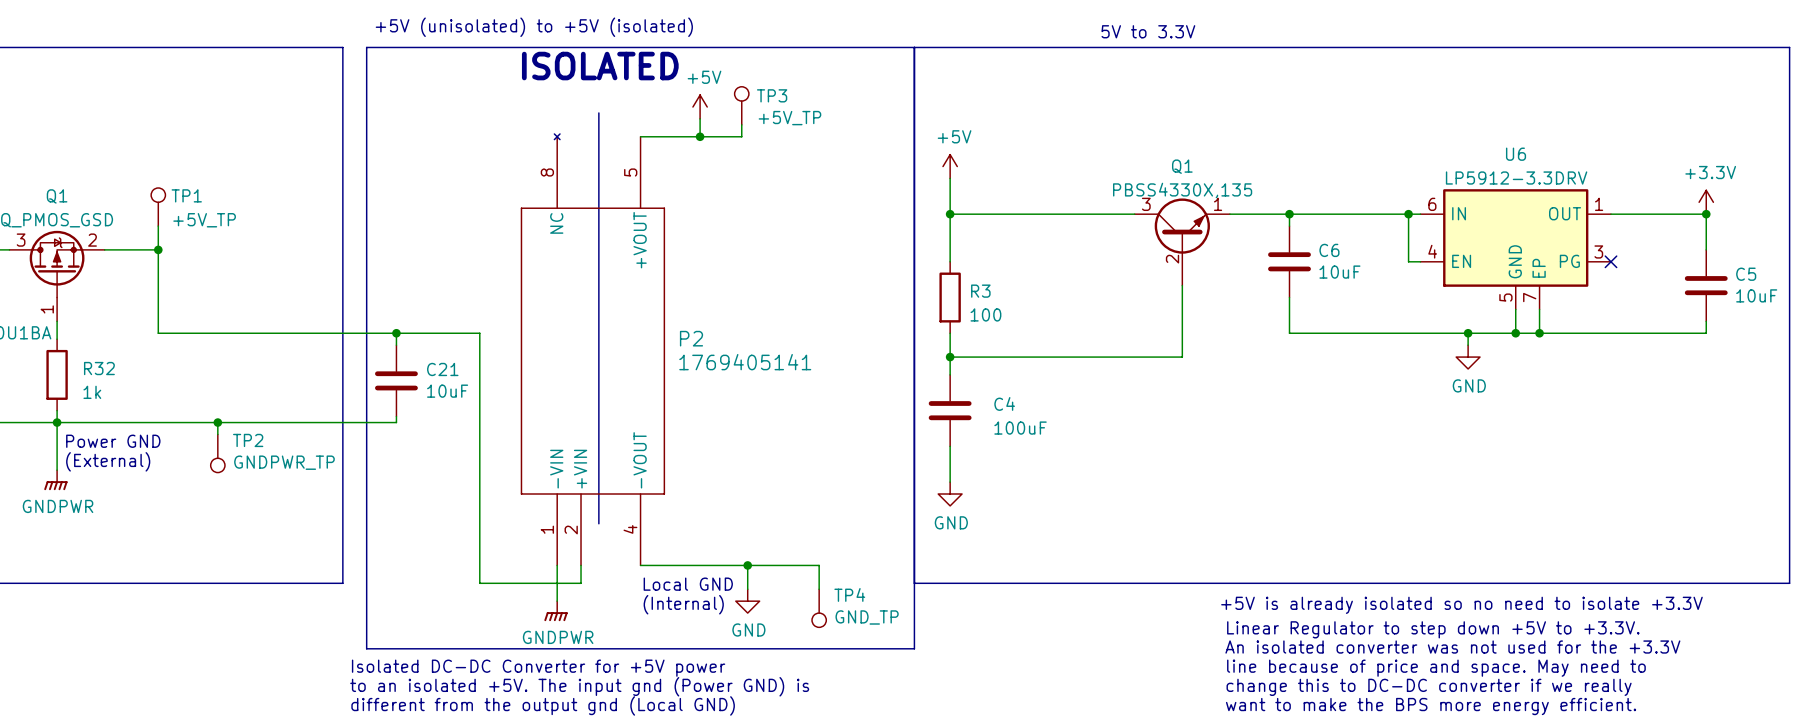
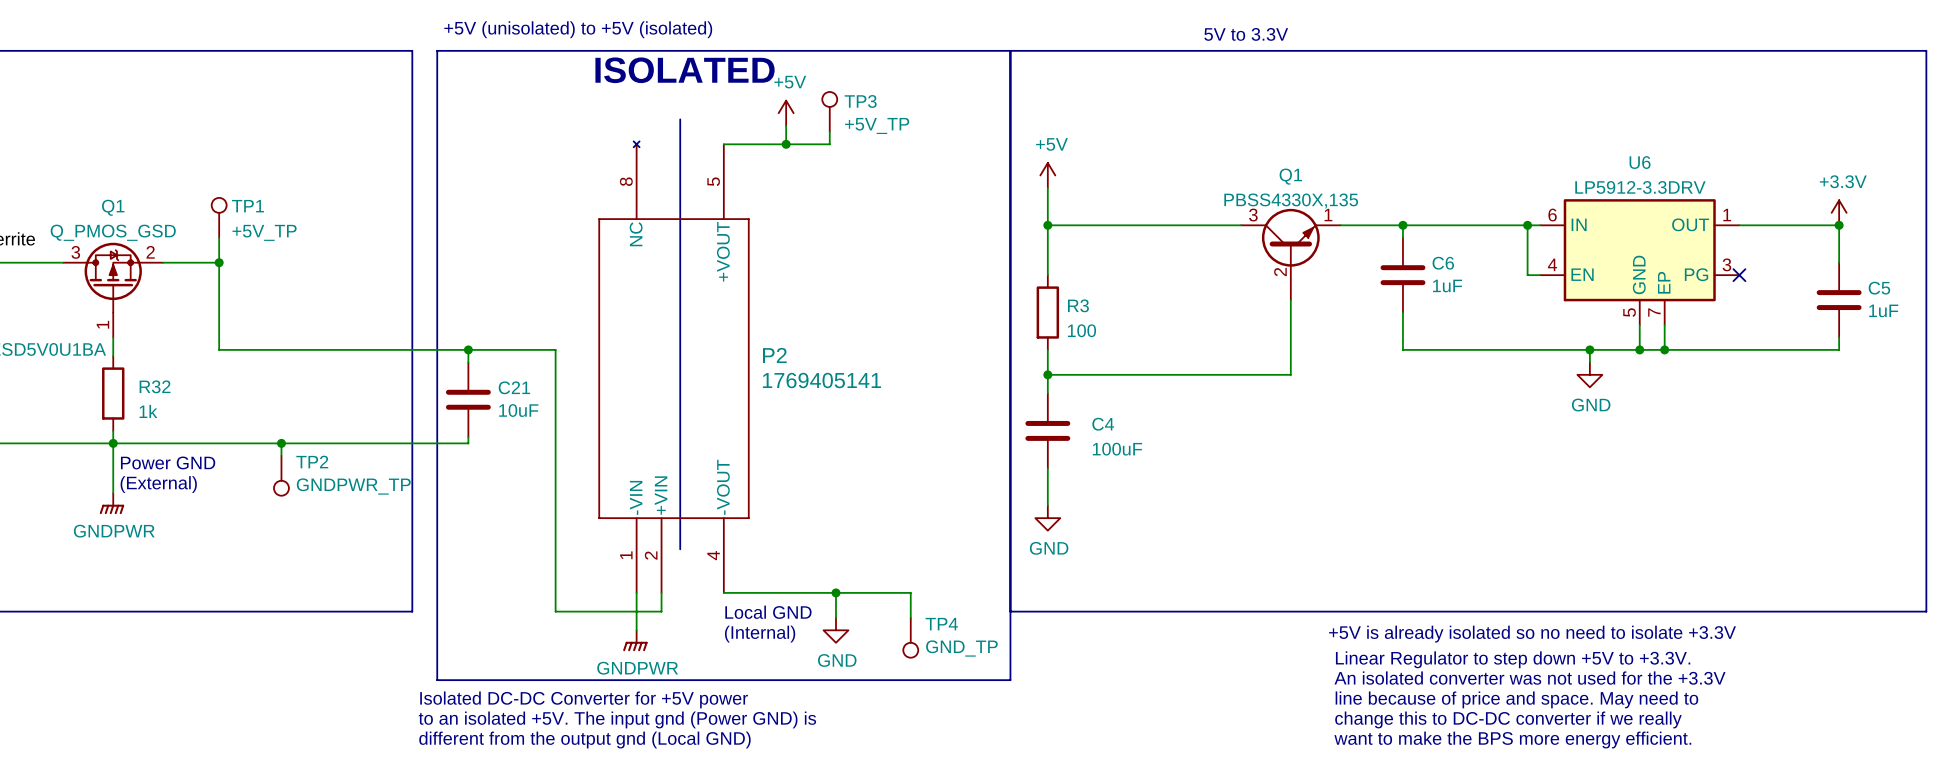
C6 value: 10uF (1339, 272) -> 1uF (1447, 285)
C5 value: 10uF (1756, 295) -> 1uF (1883, 310)

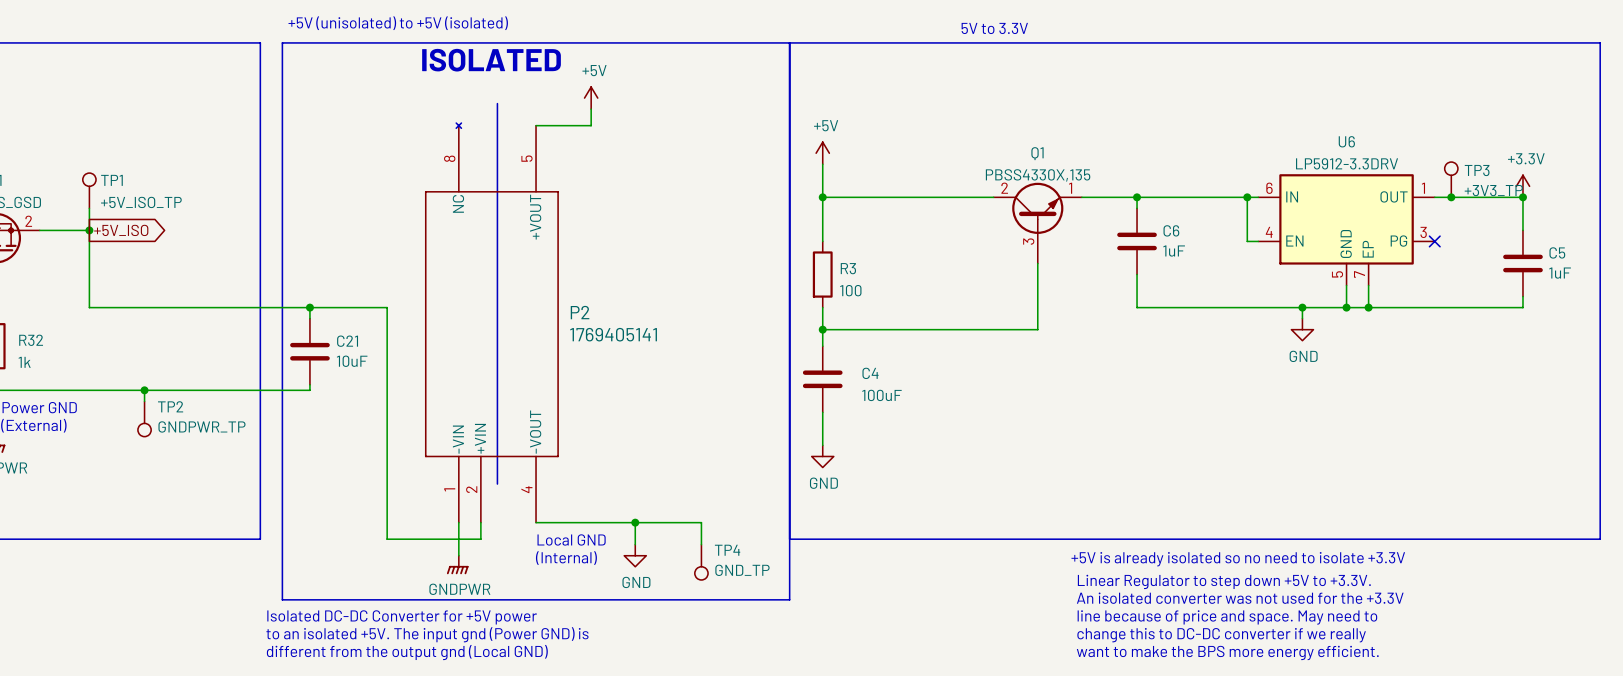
TP3 position: (829, 111) -> (1451, 179)
TP3 value: +5V_TP (877, 125) -> +3V3_TP (1493, 190)
wire: (829, 131) (829, 144) (786, 144) -> none
junction: (786, 144) -> none
Q1 symbol: [1240, 208, 1341, 301] -> [993, 182, 1082, 264]
junction: none -> (1451, 197)
TP1 value: +5V_TP (264, 232) -> +5V_ISO_TP (141, 202)
global label: none -> +5V_ISO (121, 230)

